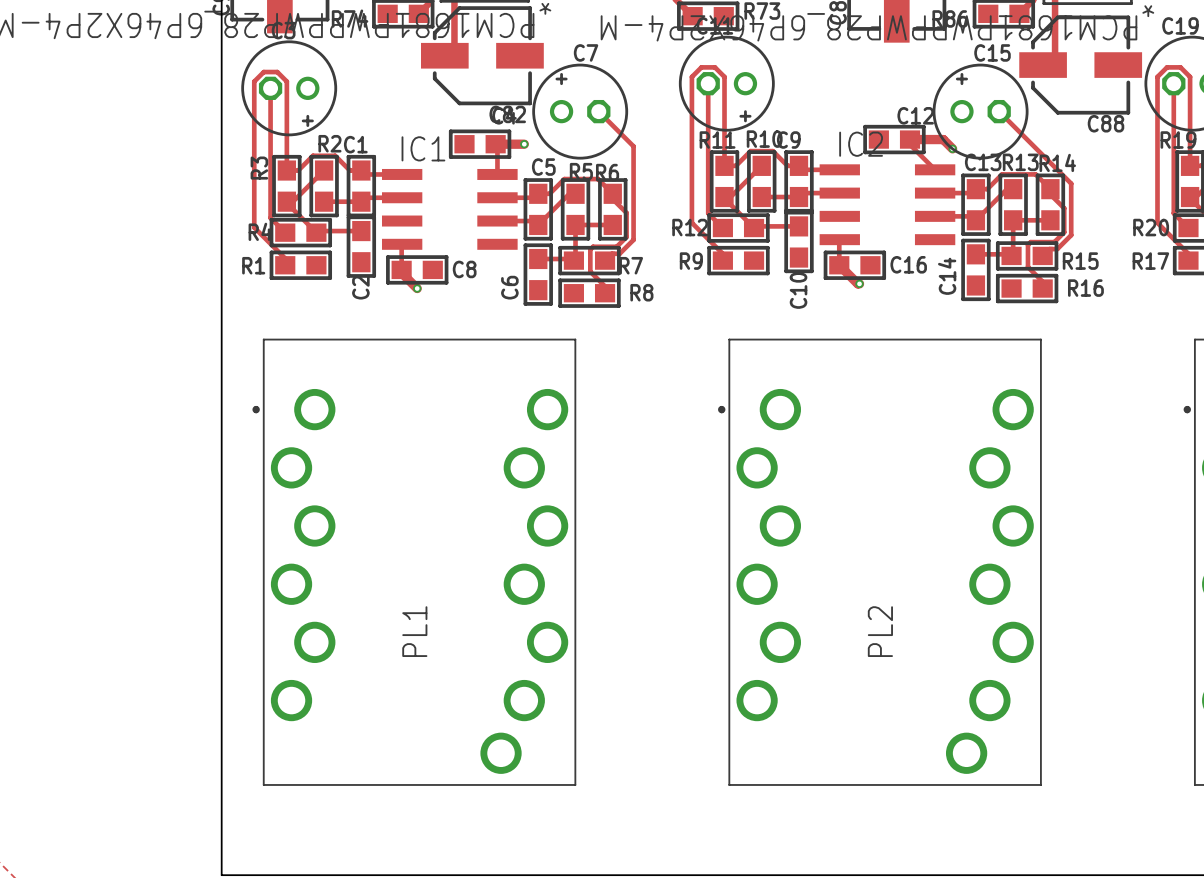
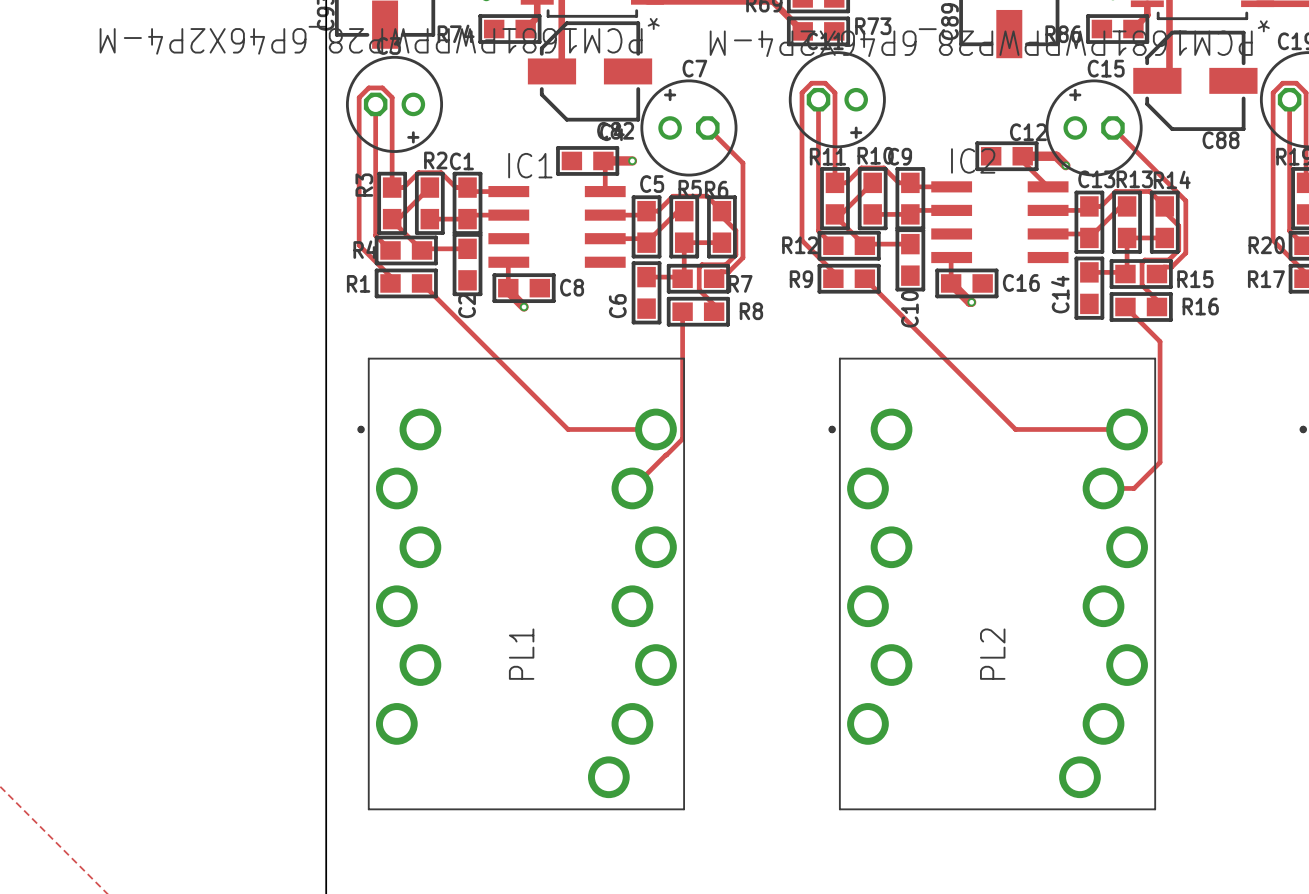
track: none -> (864, 278) (1015, 429) (1127, 429)
track: none -> (422, 283) (568, 429) (655, 429)
track: none -> (1125, 306) (1160, 341) (1160, 462) (1134, 488) (1103, 488)
track: none -> (682, 311) (682, 439) (632, 488)

